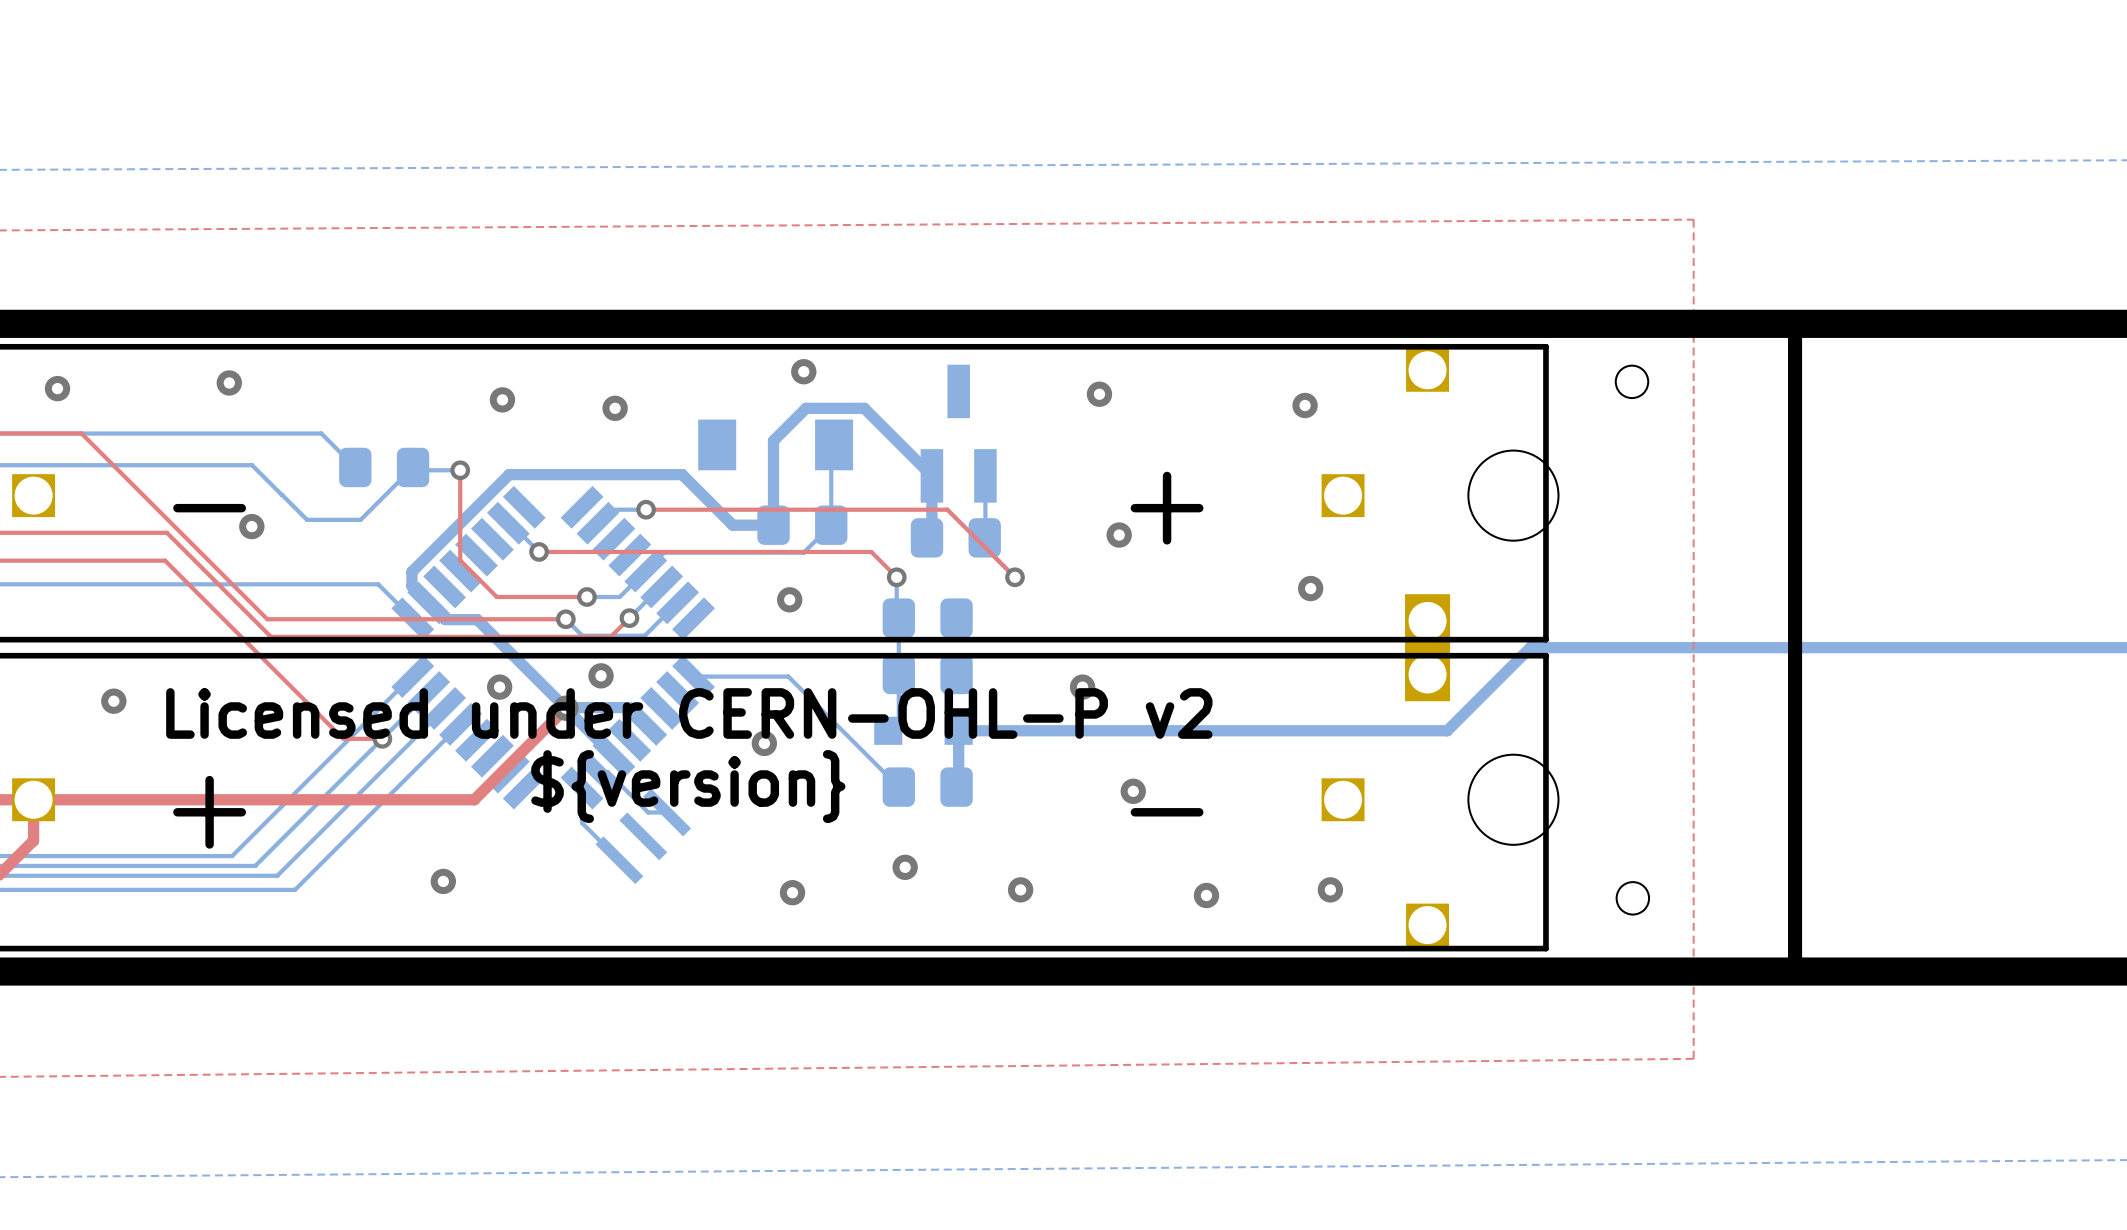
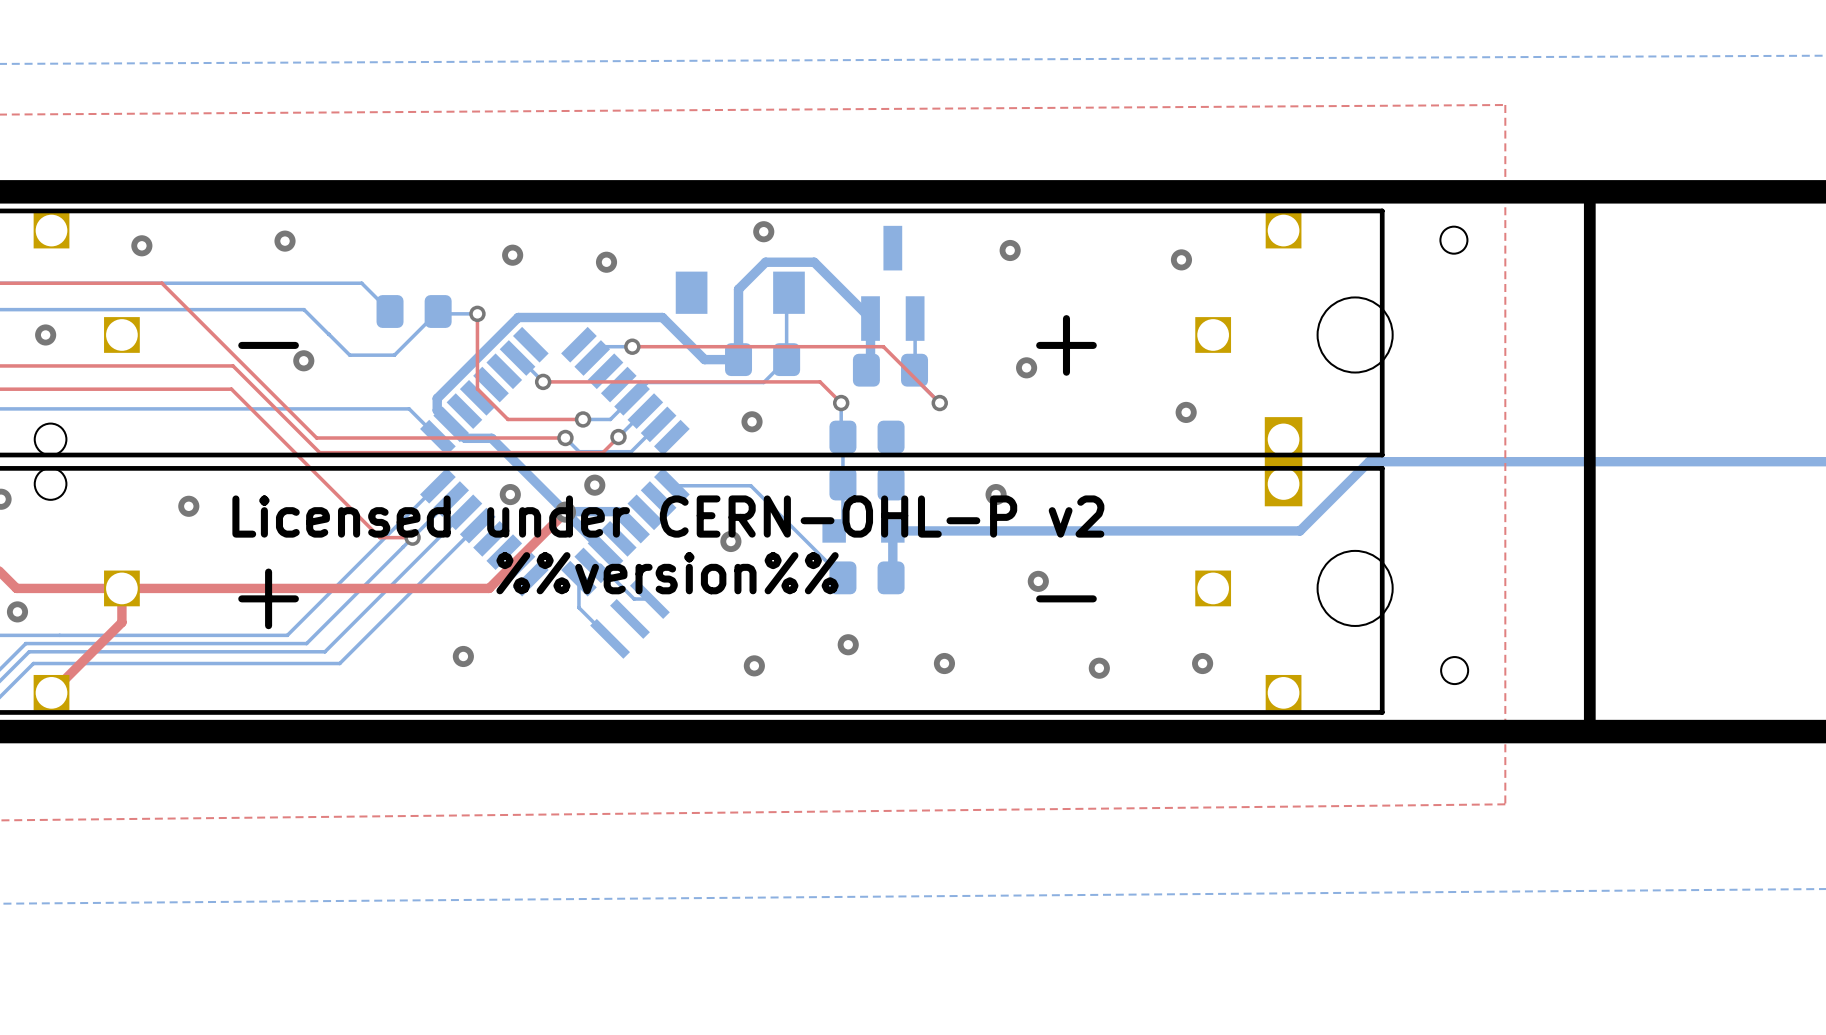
text: ${version} (688, 786) -> %%version%% (667, 573)

